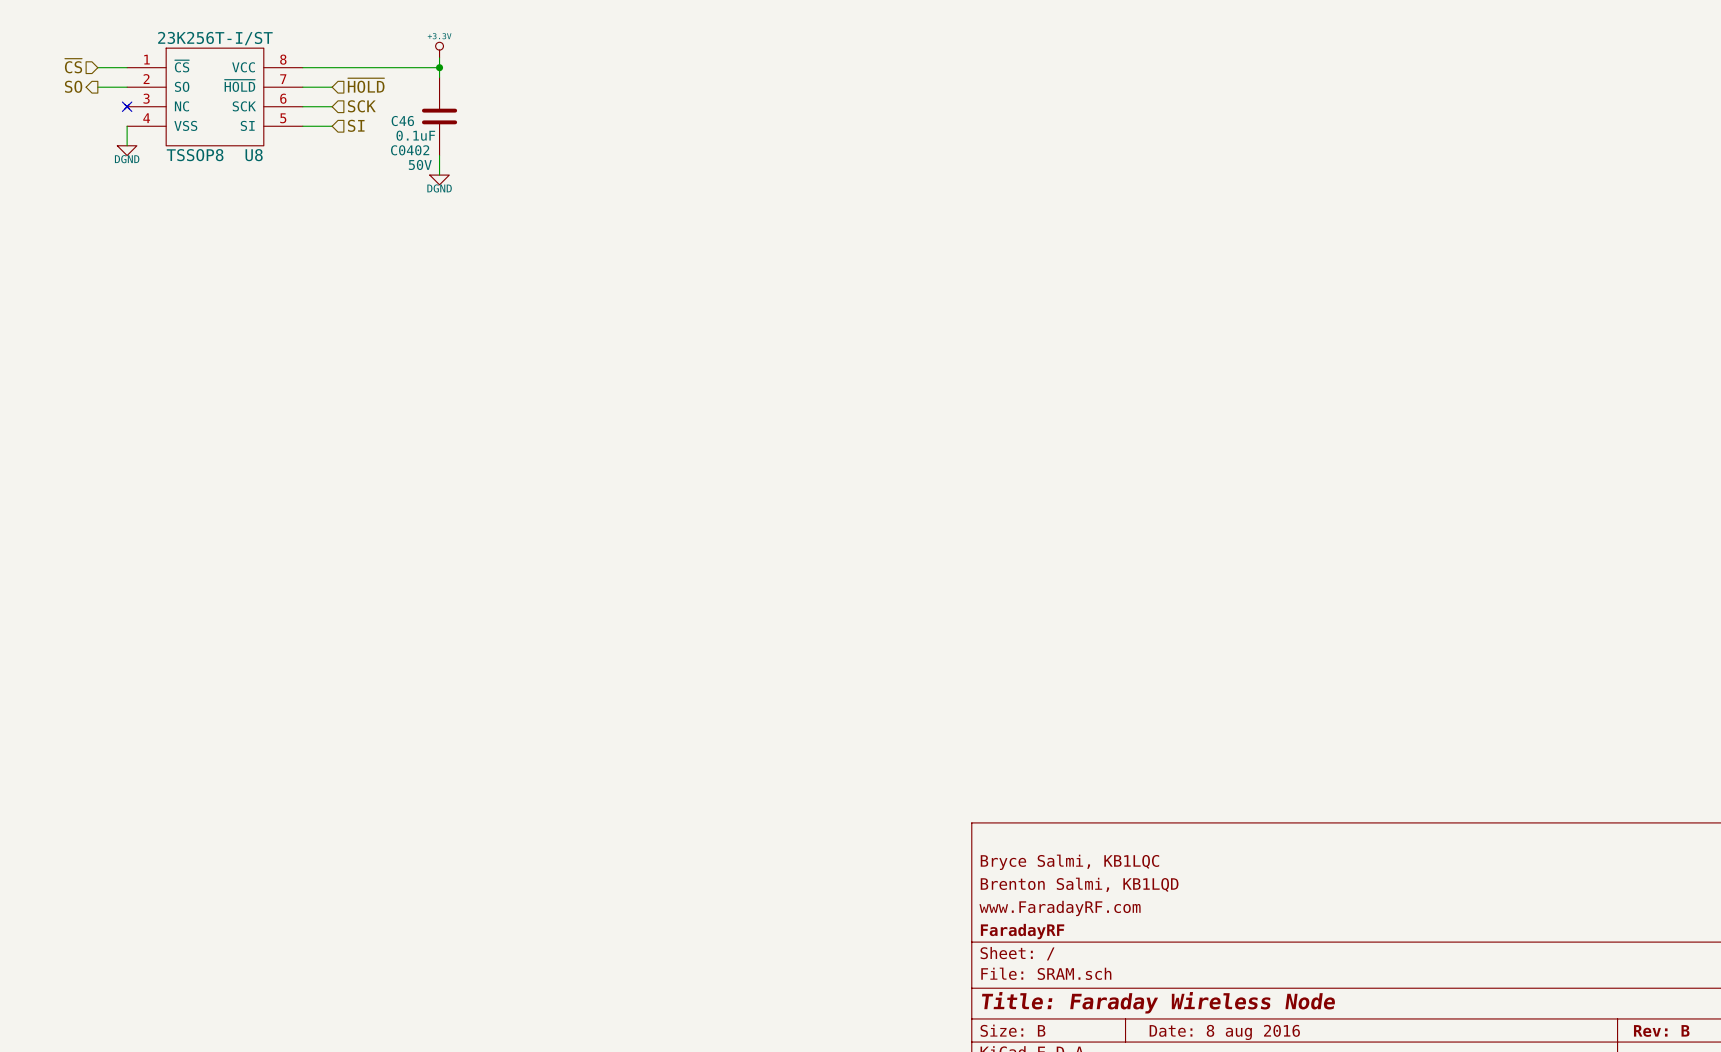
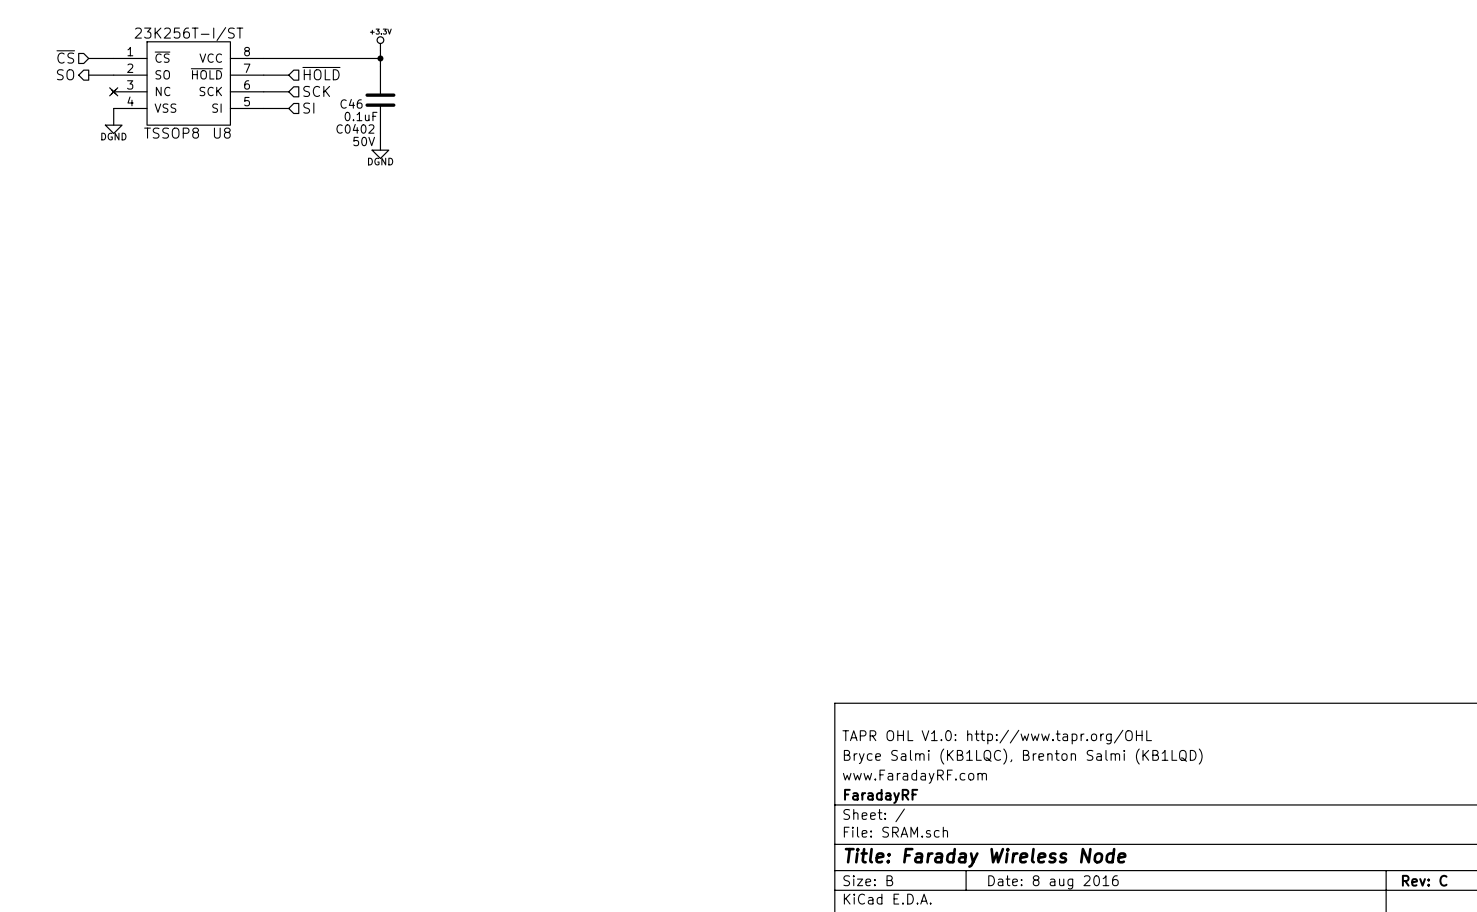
title block: Bryce Salmi, KB1LQC (1069, 862) -> TAPR OHL V1.0: http://www.tapr.org/OHL (997, 737)
title block: Brenton Salmi, KB1LQD (1079, 884) -> Bryce Salmi (KB1LQC), Brenton Salmi (KB1LQD) (1023, 756)
title block: Rev: B (1661, 1030) -> Rev: C (1424, 880)

